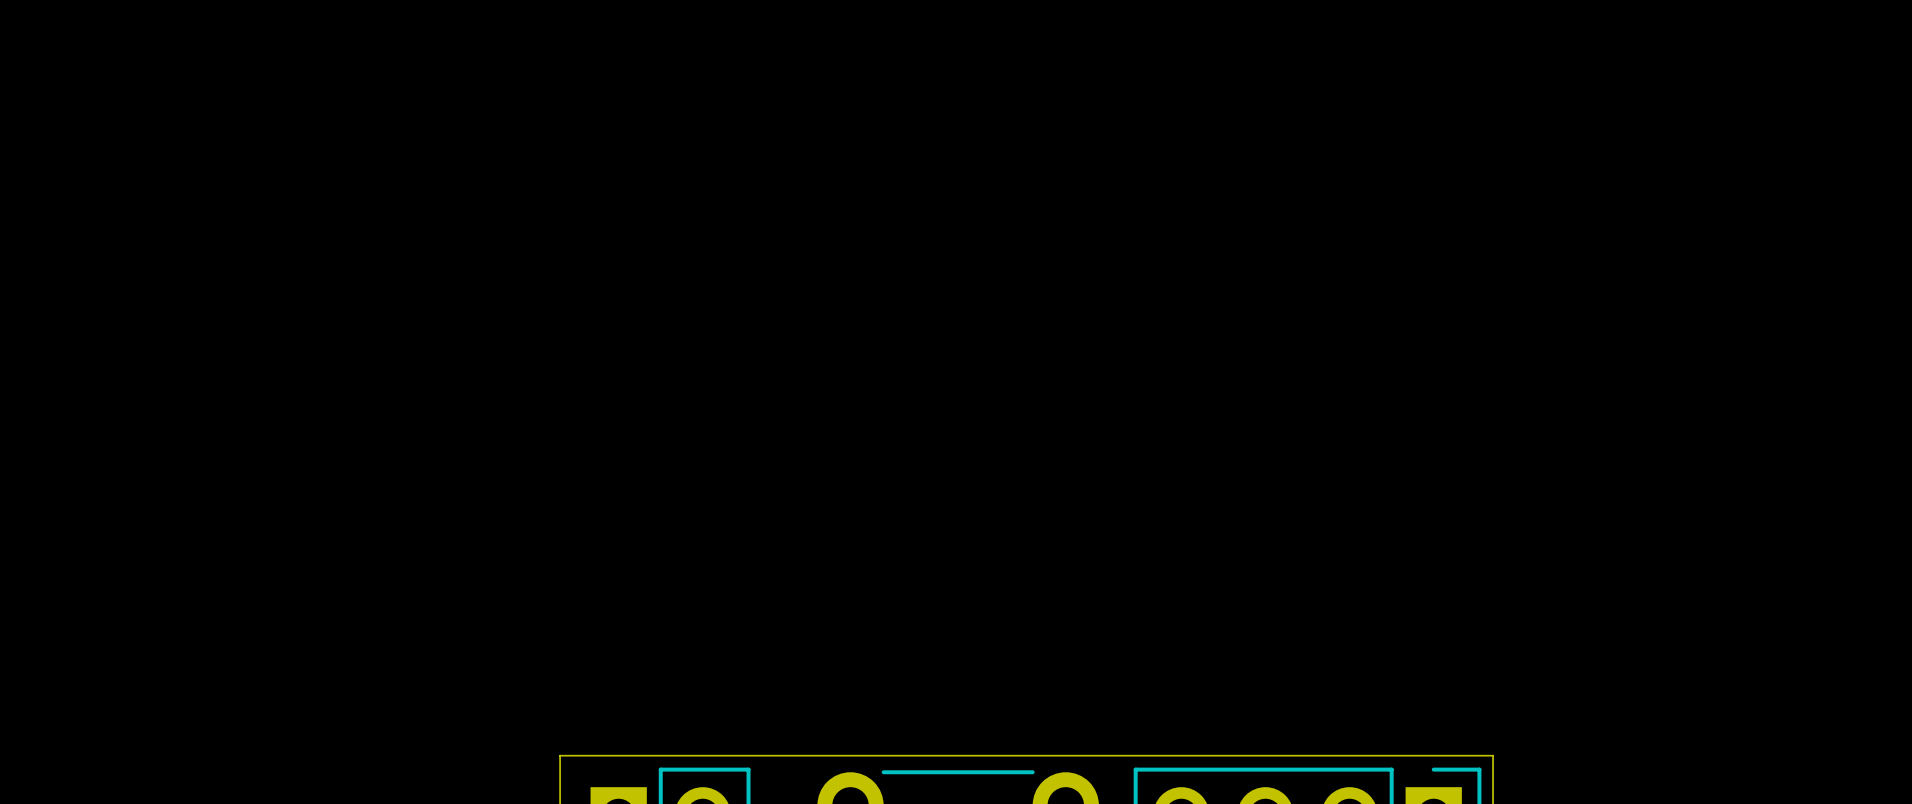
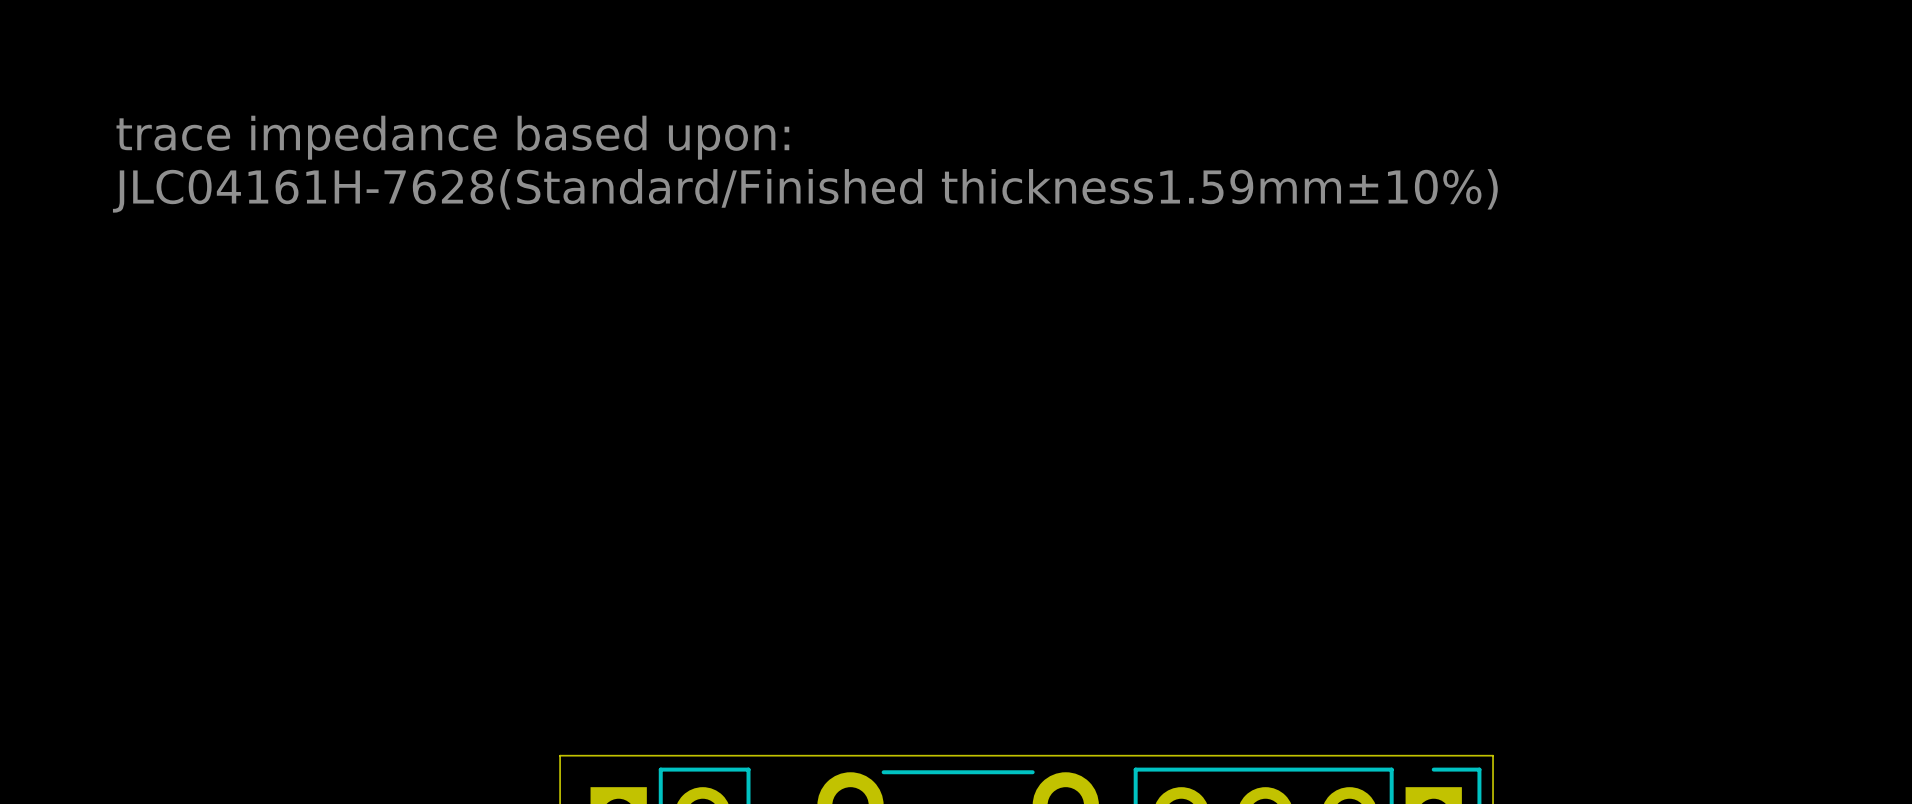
text: none -> trace impedance based upon: (452, 137)
text: none -> JLC04161H-7628(Standard/Finished thickness1.59mm±10%) (805, 190)

